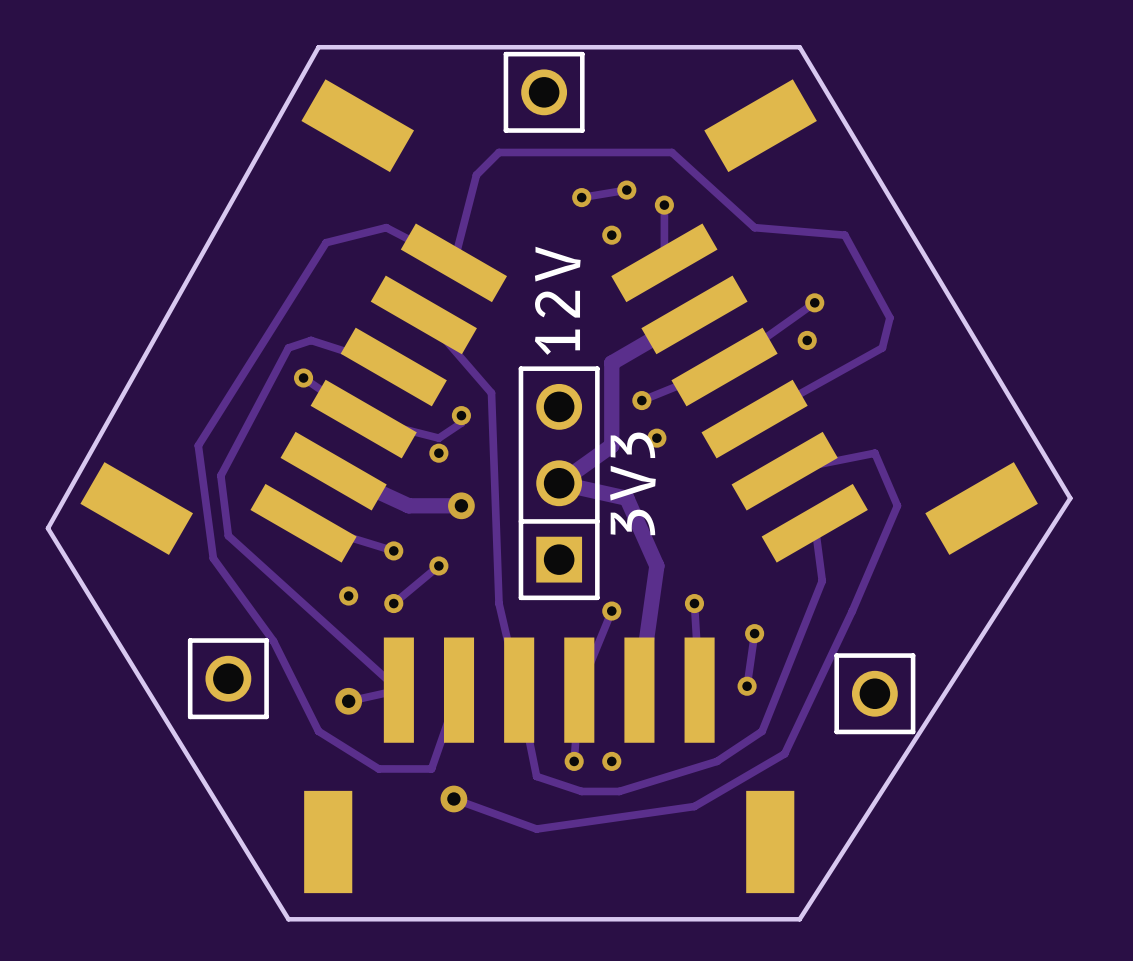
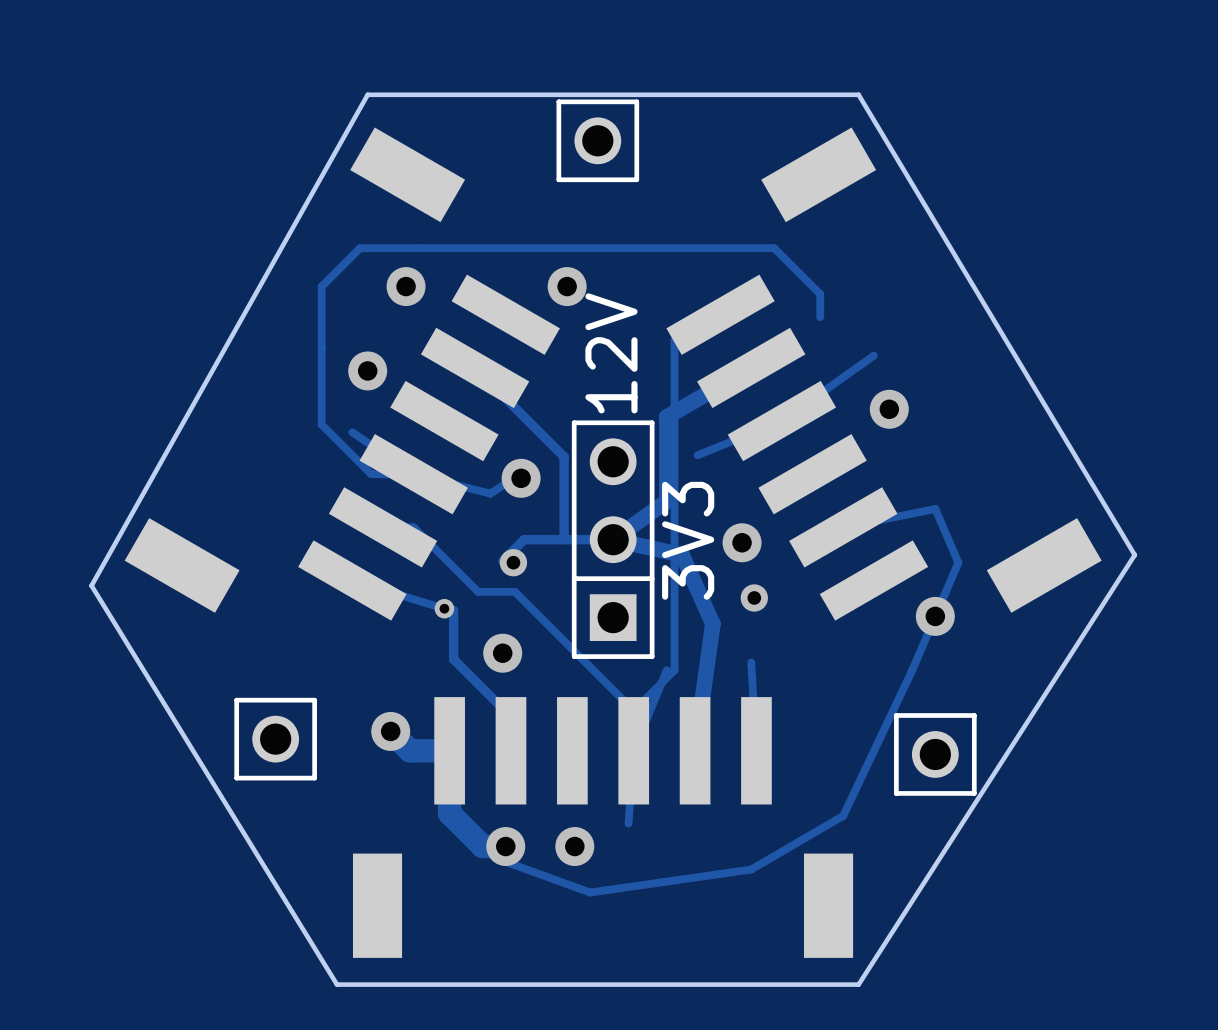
track: (626, 190) (581, 197) -> none
via: (626, 190) -> none
via: (581, 197) -> none
track: (664, 205) (664, 262) -> (633, 710) (674, 670) (674, 340) (700, 314) (720, 314)
via: (664, 205) -> none
via: none -> (406, 286)
via: none -> (567, 286)
via: (611, 235) -> none
track: none -> (820, 317) (820, 294) (774, 248) (360, 248) (321, 286) (321, 424) (371, 474) (413, 474)
via: (814, 302) -> none
track: (423, 314) (491, 393) (499, 603) (536, 776) (581, 791) (619, 791) (717, 761) (762, 731) (822, 580) (814, 523) -> (475, 367) (564, 456) (564, 539)
via: none -> (367, 370)
via size: [797, 330, 817, 350] -> [869, 389, 909, 429]
track: (393, 367) (311, 340) (288, 347) (220, 475) (228, 535) (398, 690) (348, 701) -> none
via: (303, 378) -> none
via: (641, 400) -> none
via size: [451, 406, 471, 426] -> [501, 458, 541, 498]
track: (754, 419) (882, 347) (889, 317) (844, 235) (754, 227) (671, 152) (499, 152) (476, 175) (453, 262) (386, 227) (326, 242) (198, 445) (213, 558) (273, 641) (318, 731) (378, 768) (431, 768) (459, 690) -> (453, 610) (453, 659) (510, 716) (510, 750)
via: (656, 438) -> none
via: (438, 453) -> none
track: (333, 471) (408, 505) (461, 505) -> (383, 527) (413, 527) (478, 591) (514, 591) (633, 710) (633, 750)
track: none -> (613, 539) (524, 539) (502, 561)
via: none -> (742, 542)
via: none -> (754, 597)
via: none -> (935, 616)
track: (438, 565) (393, 603) -> none
via: (438, 565) -> none
via: none -> (502, 653)
via: (348, 596) -> none
via: (393, 603) -> none
via: (694, 603) -> none
via: (611, 611) -> none
track: (754, 633) (747, 686) -> none
via: (754, 633) -> none
track: none -> (390, 731) (410, 750) (449, 750) (449, 813) (482, 846) (505, 846)
via: none -> (390, 731)
via: (747, 686) -> none
via: (348, 701) -> none
via: (574, 761) -> none
via: (611, 761) -> none
via: none -> (574, 846)
via size: [440, 785, 468, 813] -> [486, 827, 526, 867]

